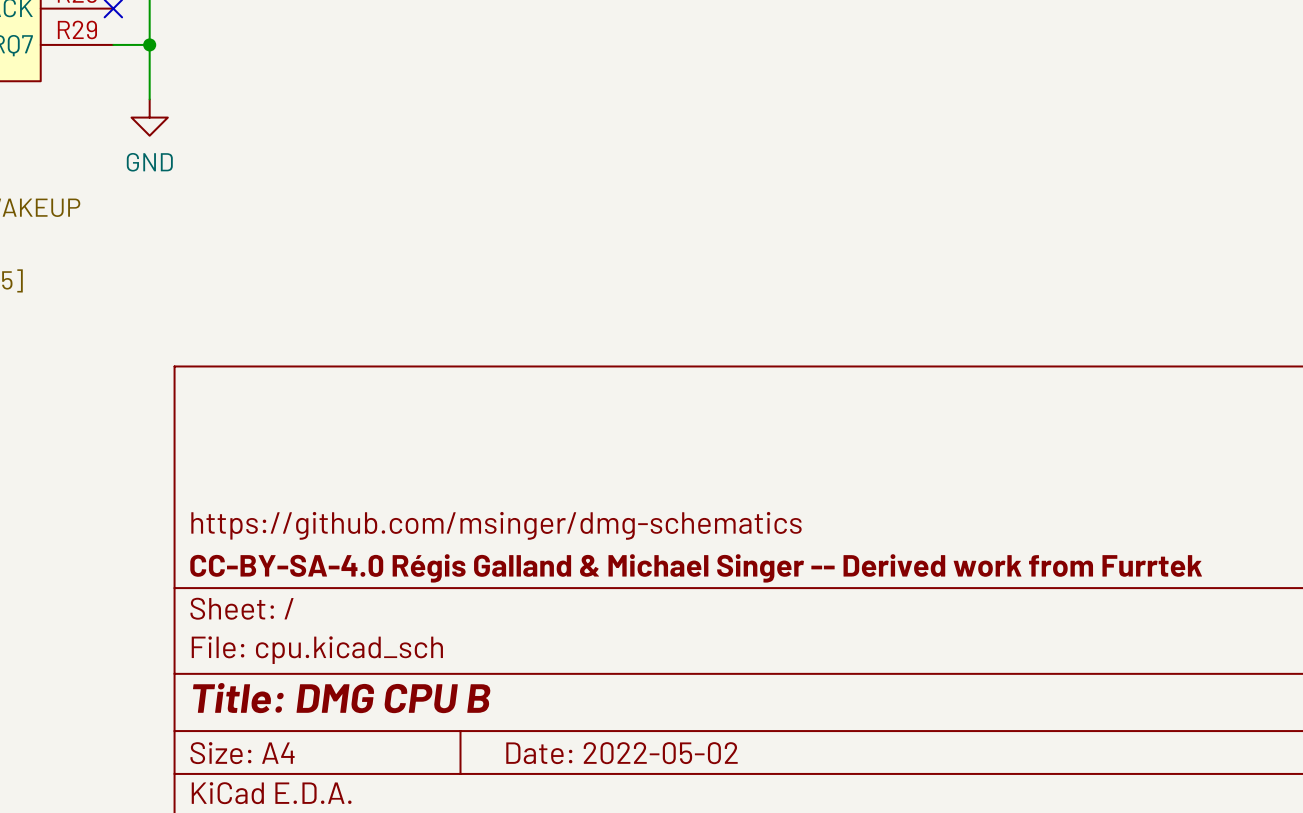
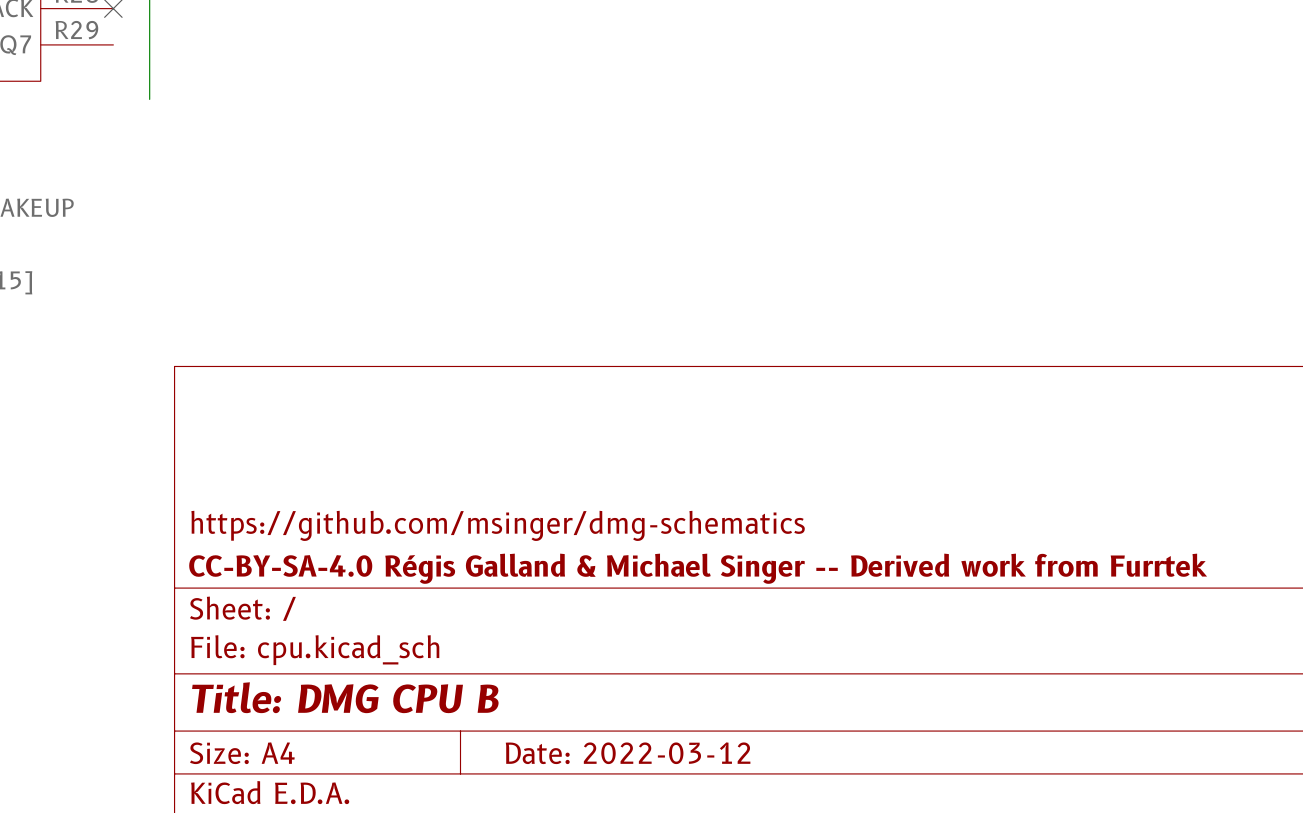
wire: (113, 44) (149, 44) -> none
junction: (149, 44) -> none
power symbol: GND (149, 117) -> none
title block: Date: 2022-05-02 (621, 753) -> Date: 2022-03-12 (628, 753)

